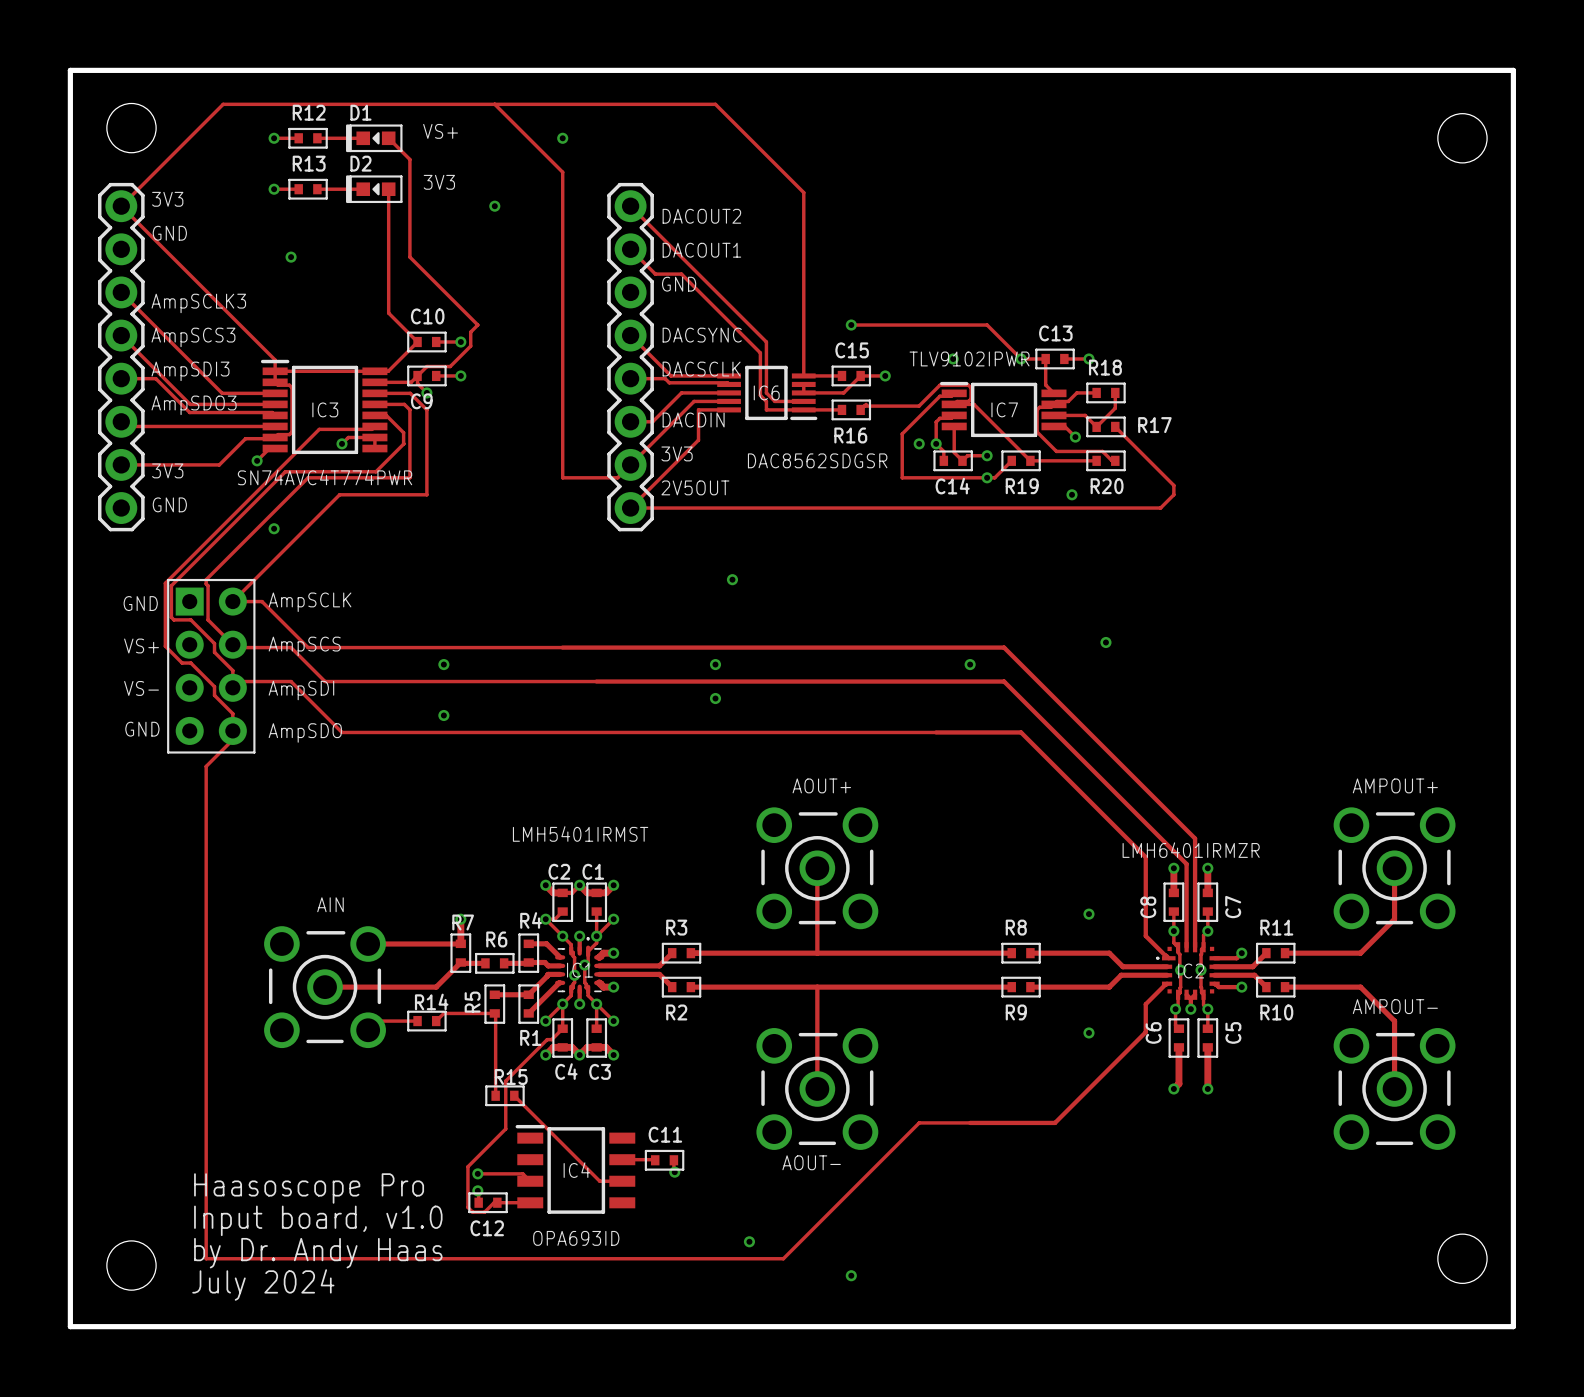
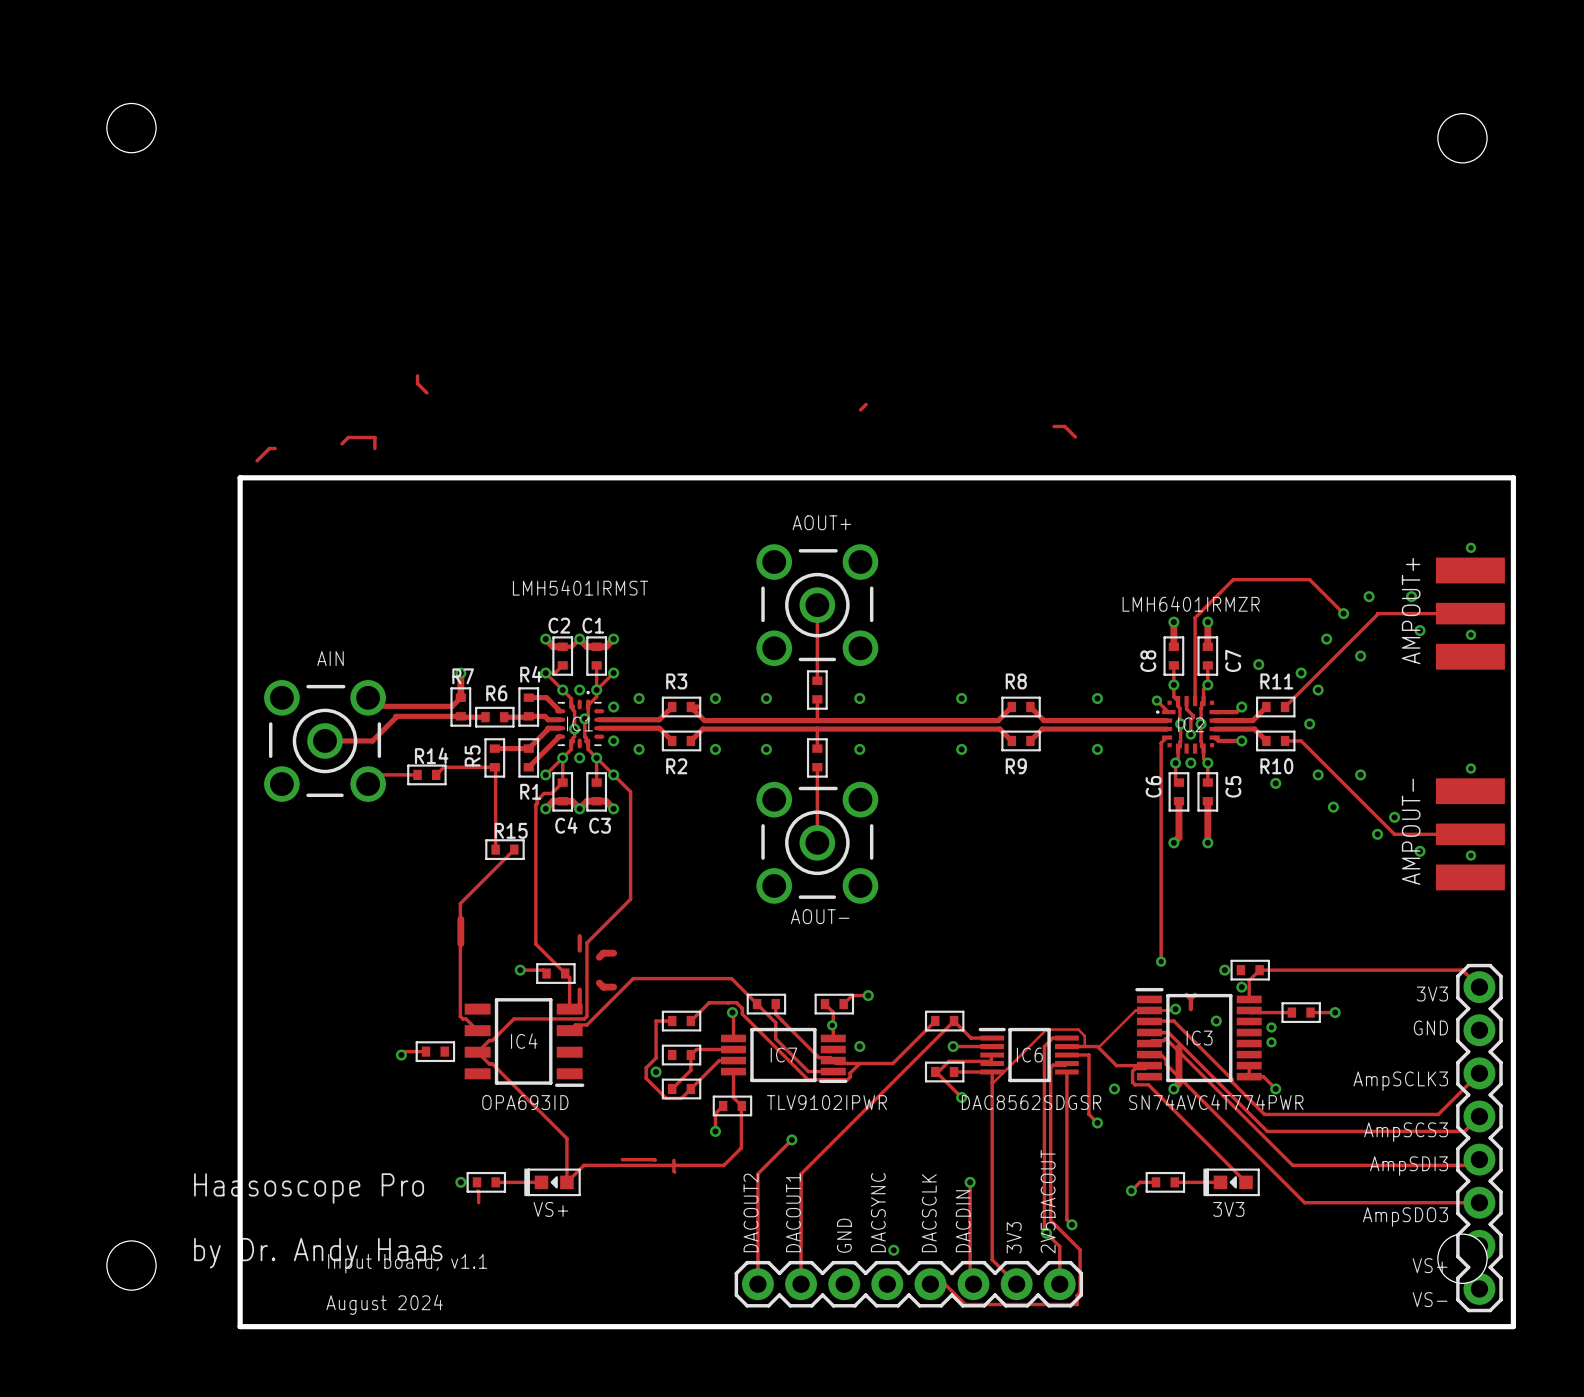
track: (494, 104) (562, 172) (562, 477) (617, 477) (694, 401) (729, 401) -> none
text: VS+ (440, 131) -> none
track: (274, 138) (298, 138) -> none
via: (274, 138) -> none
R12: (308, 138) -> none
track: (317, 138) (363, 138) -> none
D1: (374, 138) -> none
track: (388, 138) (409, 159) (409, 257) (477, 325) (470, 332) (470, 346) (450, 366) (426, 366) (411, 382) (374, 382) -> none
via: (562, 138) -> none
text: 3V3 (439, 182) -> none
track: (274, 189) (298, 189) -> none
via: (274, 189) -> none
R13: (308, 189) -> none
track: (317, 189) (363, 189) -> none
D2: (374, 189) -> none
track: (388, 189) (388, 313) (417, 342) (388, 371) (275, 371) -> none
text: 3V3 (167, 199) -> none
via: (494, 206) -> none
track: (630, 206) (766, 342) (766, 392) (774, 401) (803, 401) -> none
text: DACOUT2 (701, 216) -> none
text: GND (169, 233) -> none
track: (630, 249) (655, 274) (681, 274) (760, 352) (760, 395) (766, 401) (766, 409) (841, 409) -> none
text: DACOUT1 (701, 250) -> none
via: (291, 257) -> none
text: GND (679, 284) -> none
track: (121, 292) (222, 393) (275, 393) -> none
text: AmpSCLK3 (198, 303) -> none
track: (851, 325) (987, 325) (1021, 358) (1045, 358) (1045, 385) (1053, 393) -> none
via: (851, 325) -> none
track: (121, 335) (190, 404) (275, 404) -> none
track: (630, 335) (671, 375) (729, 375) -> none
text: DACSYNC (702, 335) -> none
text: AmpSCS3 (193, 337) -> none
C10: (426, 342) -> none
track: (436, 342) (460, 342) -> none
via: (460, 342) -> none
part: (121, 357) -> none
part: (630, 357) -> none
via: (953, 358) -> none
via: (1021, 358) -> none
C13: (1055, 358) -> none
track: (1064, 358) (1088, 358) -> none
via: (1088, 358) -> none
text: DACSCLK (701, 369) -> none
text: AmpSDI3 (190, 371) -> none
C9: (426, 375) -> none
track: (436, 375) (460, 375) -> none
via: (460, 375) -> none
track: (841, 375) (803, 375) (803, 192) (715, 104) (223, 104) (121, 206) (275, 360) (275, 382) (278, 385) (289, 385) (291, 387) (291, 432) (289, 434) (278, 434) (273, 438) (245, 438) (219, 464) (121, 464) -> none
C15: (851, 375) -> none
track: (885, 375) (860, 375) (843, 392) (803, 392) (803, 384) -> none
via: (885, 375) -> none
track: (121, 378) (155, 378) (189, 412) (272, 412) (275, 415) -> none
track: (630, 378) (665, 378) (669, 382) (727, 382) (729, 384) -> none
via: (426, 392) -> none
track: (729, 392) (681, 392) (652, 421) (630, 421) -> none
IC6 rotation: 0° (767, 392) -> 180° (1028, 1055)
IC6 position: (767, 392) -> (1028, 1055)
track: (1096, 392) (1076, 392) (1068, 401) (1056, 401) (1051, 407) (1039, 407) (1037, 409) (1037, 432) (1056, 451) (1102, 451) (1112, 460) (1115, 460) -> none
R18: (1105, 392) -> none
track: (1115, 392) (1115, 408) (1096, 426) (1085, 415) (1053, 415) -> none
track: (374, 393) (410, 393) (426, 409) (426, 494) (339, 494) (232, 601) (262, 601) (308, 647) (1004, 647) (1195, 838) (1195, 947) -> none
track: (954, 393) (951, 396) (939, 396) (902, 433) (902, 477) (994, 477) (1011, 460) -> none
track: (374, 404) (404, 404) (409, 409) (409, 477) (308, 477) (206, 579) (208, 585) (208, 619) (235, 647) (291, 647) (325, 681) (1004, 681) (1186, 864) (1186, 947) -> none
text: AmpSDO3 (194, 405) -> none
IC3 position: (324, 406) -> (1198, 1035)
track: (864, 406) (919, 406) (939, 385) (968, 385) (971, 387) (971, 398) (968, 401) (957, 401) (954, 404) (973, 404) (1030, 460) (1096, 460) -> none
track: (729, 409) (698, 409) (698, 440) (630, 508) (1160, 508) (1173, 494) (1173, 485) (1115, 426) -> none
R16: (851, 409) -> none
IC7 rotation: 0° (1003, 409) -> 180° (784, 1055)
IC7 position: (1003, 409) -> (784, 1055)
track: (374, 415) (386, 415) (403, 432) (403, 443) (375, 471) (285, 471) (171, 585) (171, 617) (173, 619) (190, 619) (214, 643) (214, 652) (232, 670) (232, 687) (239, 681) (291, 681) (342, 732) (1021, 732) (1145, 857) (1145, 936) (1168, 958) -> none
track: (954, 415) (951, 418) (939, 418) (936, 422) (936, 443) (943, 451) (943, 460) -> none
text: DACDIN (693, 419) -> none
track: (121, 421) (125, 426) (275, 426) -> none
track: (374, 426) (372, 429) (319, 429) (165, 583) (165, 646) (182, 663) (190, 663) (214, 686) (214, 695) (232, 713) (232, 739) (206, 766) (206, 1258) (783, 1258) (919, 1122) (1055, 1122) (1145, 1032) (1145, 1004) (1167, 983) -> none
track: (954, 426) (954, 452) (962, 460) (967, 455) (987, 455) -> none
R17: (1105, 426) -> none
via: (1075, 437) -> none
via: (342, 443) -> none
via: (919, 443) -> none
via: (936, 443) -> none
text: 3V3 (677, 453) -> none
via: (987, 455) -> none
via: (257, 460) -> none
IC6 value position: DAC8562SDGSR (817, 460) -> DAC8562SDGSR (1031, 1102)
C14: (953, 460) -> none
R19: (1021, 460) -> none
R20: (1105, 460) -> none
text: 3V3 (167, 470) -> none
IC3 value position: SN74AVC4T774PWR (325, 477) -> SN74AVC4T774PWR (1216, 1102)
via: (987, 477) -> none
board edge: (1513, 477) (1513, 70) (70, 70) (70, 1326) (240, 1326) -> (1513, 477) (240, 477) (240, 1326)
text: 2V5OUT (695, 487) -> none
via: (1072, 494) -> none
text: GND (169, 504) -> none
via: (274, 528) -> none
via: none -> (1470, 547)
via: (732, 579) -> none
via: none -> (1369, 596)
via: none -> (1411, 596)
text: AmpSCLK (310, 602) -> none
text: GND (140, 603) -> none
track: none -> (817, 605) (817, 680)
track: none -> (1343, 613) (1309, 579) (1233, 579) (1195, 617) (1195, 701)
via: none -> (1343, 613)
track: none -> (1470, 613) (1377, 613) (1285, 707)
AMPOUT+: none -> (1470, 613)
via: none -> (1173, 622)
via: none -> (1207, 622)
via: none -> (1420, 630)
via: none -> (1470, 634)
via: none -> (545, 639)
via: none -> (579, 639)
via: none -> (613, 639)
via: none -> (1326, 639)
via: (1105, 642) -> none
text: VS+ (141, 645) -> none
text: AmpSCS (304, 646) -> none
via: none -> (1360, 656)
via position: (443, 664) -> (460, 673)
via: (715, 664) -> none
via position: (970, 664) -> (961, 698)
via: none -> (1258, 664)
track: none -> (596, 665) (596, 696) (588, 705) (588, 715) (584, 718) (584, 736) (588, 743) (588, 749) (630, 791) (630, 899) (586, 942) (586, 1016) (584, 1018) (513, 1018) (477, 1052) (489, 1063) (492, 1063) (566, 1138) (566, 1182) (583, 1165) (723, 1165) (741, 1147) (741, 1105)
track: none -> (1173, 665) (1173, 696) (1178, 701) (1180, 723) (1180, 746) (1178, 748) (1178, 760) (1175, 763) (1175, 779) (1178, 782)
part: (211, 666) -> none
track: none -> (460, 673) (460, 697) (452, 706) (376, 706) (368, 697)
via: none -> (545, 673)
via: none -> (613, 673)
via: none -> (1301, 673)
via: none -> (1173, 684)
via: none -> (1207, 684)
text: VS- (141, 688) -> none
text: AmpSDI (301, 690) -> none
via: none -> (562, 690)
via: none -> (579, 690)
via: none -> (596, 690)
part: none -> (817, 690)
via: none -> (1318, 690)
via: none -> (639, 698)
via: none -> (766, 698)
via: none -> (859, 698)
via: none -> (1097, 698)
track: none -> (817, 699) (817, 720)
track: none -> (1156, 700) (1168, 712)
via: none -> (1156, 700)
track: none -> (1186, 701) (1186, 709) (1192, 715) (1190, 719) (1190, 734)
via: none -> (613, 707)
track: none -> (698, 707) (690, 707) (704, 720) (998, 720) (1011, 707)
track: none -> (1030, 707) (1043, 720) (1167, 720)
via: none -> (1241, 707)
via: (443, 715) -> none
track: none -> (485, 717) (396, 716) (372, 740) (325, 740)
via: none -> (584, 718)
via: none -> (1180, 723)
via: none -> (1201, 723)
via: none -> (1309, 723)
text: GND (142, 729) -> none
via: none -> (574, 729)
track: none -> (817, 729) (817, 748)
track: none -> (1167, 729) (1042, 729) (1030, 740)
text: AmpSDO (305, 732) -> none
via: none -> (1190, 734)
track: none -> (1167, 737) (1161, 743) (1161, 961)
via: none -> (613, 740)
track: none -> (690, 740) (702, 729) (999, 729) (1011, 740)
via: none -> (1241, 740)
track: none -> (1285, 740) (1301, 740) (1394, 834) (1479, 834)
via: none -> (639, 749)
via: none -> (715, 749)
via: none -> (766, 749)
via: none -> (859, 749)
via: none -> (961, 749)
via: none -> (1097, 749)
track: none -> (562, 757) (562, 782) (551, 793) (544, 793) (535, 804) (535, 944) (569, 977) (569, 1009)
via: none -> (562, 757)
via: none -> (579, 757)
via: none -> (596, 757)
part: none -> (817, 757)
via: none -> (1175, 763)
via: none -> (1190, 763)
via: none -> (1207, 763)
track: none -> (817, 767) (817, 842)
via: none -> (1470, 768)
via: none -> (545, 774)
via: none -> (613, 774)
via: none -> (1318, 774)
via: none -> (1360, 774)
via: none -> (1275, 783)
track: none -> (1178, 801) (1178, 837) (1173, 842)
via: none -> (1333, 807)
via: none -> (545, 808)
via: none -> (579, 808)
via: none -> (613, 808)
via: none -> (1394, 817)
via: none -> (1377, 834)
AMPOUT-: none -> (1470, 834)
via: none -> (1173, 842)
via: none -> (1207, 842)
track: none -> (514, 849) (460, 903) (460, 1016) (465, 1018) (477, 1030)
via: none -> (1420, 851)
via: none -> (1470, 855)
track: (817, 868) (817, 953) -> none
AOUT+ position: (817, 868) -> (817, 605)
track: (1173, 868) (1173, 892) -> (1173, 622) (1173, 646)
via: (1173, 868) -> none
track: (1207, 868) (1207, 892) -> (1207, 622) (1207, 646)
via: (1207, 868) -> none
track: (1394, 868) (1394, 919) (1360, 953) (1285, 953) -> none
AMPOUT+: (1394, 868) -> none
track: (545, 885) (553, 892) (572, 892) (579, 885) (587, 892) (605, 892) (613, 885) -> (545, 639) (553, 646) (572, 646) (579, 639) (587, 646) (605, 646) (613, 639)
via: (545, 885) -> none
via: (579, 885) -> none
via: (613, 885) -> none
C2 position: (562, 902) -> (562, 656)
C1 position: (596, 902) -> (596, 656)
C8 position: (1173, 902) -> (1173, 656)
C7 position: (1207, 902) -> (1207, 656)
track: (562, 911) (555, 919) (545, 919) (571, 944) (571, 950) (574, 957) (574, 982) (571, 989) (571, 995) (545, 1021) -> (562, 665) (555, 673) (545, 673) (571, 698) (571, 704) (574, 711) (574, 736) (571, 743) (571, 749) (545, 774)
track: (596, 911) (596, 942) (588, 951) (588, 961) (584, 965) (584, 982) (588, 989) (588, 995) (613, 1021) -> none
track: (1173, 911) (1173, 942) (1176, 945) -> none
track: (1207, 911) (1207, 931) (1203, 935) (1203, 947) (1201, 954) (1201, 987) (1203, 1004) (1207, 1009) (1207, 1028) -> (1207, 665) (1207, 684) (1203, 689) (1203, 701) (1201, 708) (1201, 741) (1203, 758) (1207, 763) (1207, 782)
via: (1088, 914) -> none
via: (460, 919) -> none
via: (545, 919) -> none
track: (613, 919) (596, 936) -> (613, 673) (596, 690)
via: (613, 919) -> none
via: (1173, 931) -> none
via: (1207, 931) -> none
via: (562, 936) -> none
via: (579, 936) -> none
via: (596, 936) -> none
track: (528, 943) (546, 943) (560, 957) -> (528, 697) (546, 697) (560, 711)
track: (368, 944) (460, 944) -> none
track: (1176, 945) (1179, 954) (1180, 970) (1180, 992) (1178, 994) (1178, 1006) (1175, 1009) (1175, 1025) (1178, 1028) -> none
R7 position: (460, 953) -> (460, 707)
R4 position: (528, 953) -> (528, 707)
via: (613, 953) -> none
track: (672, 953) (659, 965) (599, 965) -> (672, 707) (659, 719) (599, 719)
R3 position: (681, 953) -> (681, 707)
track: (690, 953) (1011, 953) -> none
R8 position: (1021, 953) -> (1021, 707)
track: (1030, 953) (1109, 953) (1122, 966) (1167, 966) -> none
track: (1241, 953) (1236, 958) (1214, 958) -> (1241, 707) (1236, 712) (1214, 712)
via: (1241, 953) -> none
track: (1266, 953) (1252, 966) (1214, 966) -> (1266, 707) (1252, 720) (1214, 720)
R11 position: (1275, 953) -> (1275, 707)
via: none -> (1161, 961)
track: (485, 963) (460, 962) (436, 987) (325, 987) -> none
R6 position: (494, 963) -> (494, 717)
track: (504, 963) (544, 962) (548, 965) (560, 965) -> (504, 717) (544, 716) (548, 719) (560, 719)
IC1 position: (579, 965) -> (579, 719)
via: (584, 965) -> none
track: none -> (520, 970) (543, 970) (546, 973)
via: none -> (520, 970)
via: (1180, 970) -> none
IC2 position: (1187, 970) -> (1187, 724)
via: (1201, 970) -> none
via: none -> (1224, 970)
part: none -> (1250, 970)
part: none -> (555, 973)
track: (560, 974) (548, 974) (528, 994) (494, 994) -> (560, 728) (548, 728) (528, 748) (494, 748)
track: (599, 974) (659, 974) (672, 987) -> (599, 728) (659, 728) (672, 740)
via: (574, 975) -> none
track: (1167, 975) (1121, 975) (1109, 987) (1030, 987) -> none
track: (1214, 975) (1254, 975) (1266, 987) -> (1214, 729) (1254, 729) (1266, 740)
track: (560, 982) (528, 1013) -> (560, 736) (528, 767)
track: (1214, 983) (1218, 987) (1241, 987) -> (1214, 737) (1218, 740) (1241, 740)
AIN position: (325, 987) -> (325, 740)
via: (613, 987) -> none
R2 position: (681, 987) -> (681, 740)
track: (690, 987) (1011, 987) -> none
track: (817, 987) (817, 1088) -> none
R9 position: (1021, 987) -> (1021, 740)
R10 position: (1275, 987) -> (1275, 740)
track: (1285, 987) (1360, 987) (1394, 1021) (1394, 1088) -> none
track: none -> (1479, 987) (1462, 970) (1259, 970) (1249, 980) (1249, 999)
text: none -> 3V3 (1432, 994)
track: none -> (868, 995) (852, 995) (843, 1004)
via: none -> (868, 995)
track: none -> (709, 1002) (690, 1021)
track: none -> (709, 1002) (728, 1002)
track: none -> (728, 1002) (736, 1002) (742, 1008) (742, 1014) (808, 1079) (847, 1079) (850, 1073) (859, 1063)
R5 position: (494, 1004) -> (494, 757)
R1 position: (528, 1004) -> (528, 757)
track: (562, 1004) (562, 1028) (551, 1039) (547, 1039) (505, 1081) (505, 1128) (467, 1166) (467, 1207) (472, 1212) (484, 1212) (494, 1202) (530, 1202) -> none
via: (562, 1004) -> none
via: (579, 1004) -> none
track: (596, 1004) (596, 1028) -> (596, 757) (596, 782)
via: (596, 1004) -> none
part: none -> (766, 1004)
track: none -> (775, 1004) (775, 1014) (781, 1020)
track: none -> (824, 1004) (833, 1012) (833, 1038)
part: none -> (834, 1004)
via: (1190, 1009) -> none
via: (1207, 1009) -> none
track: none -> (1173, 1010) (1135, 1010) (1098, 1047)
track: none -> (1249, 1010) (1251, 1012) (1291, 1012)
track: none -> (732, 1012) (733, 1038)
via: none -> (732, 1012)
part: none -> (1301, 1012)
track: none -> (1310, 1012) (1335, 1012)
via: none -> (1335, 1012)
track: none -> (781, 1020) (818, 1057) (830, 1057) (836, 1063) (892, 1063) (935, 1021)
track: (417, 1021) (377, 1021) (368, 1030) -> (417, 774) (377, 774) (368, 784)
R14 position: (426, 1021) -> (426, 774)
track: (436, 1021) (443, 1013) (495, 1014) (495, 1095) -> (436, 774) (443, 767) (495, 768) (495, 849)
via: (545, 1021) -> none
via: (613, 1021) -> none
track: none -> (672, 1021) (656, 1021) (656, 1058) (646, 1067) (646, 1078) (666, 1098) (681, 1098) (719, 1060) (733, 1060)
part: none -> (681, 1021)
part: none -> (944, 1021)
track: none -> (1149, 1021) (1173, 1021) (1264, 1114) (1438, 1114) (1479, 1073)
via: none -> (1216, 1021)
via: none -> (832, 1025)
via: none -> (1271, 1027)
text: none -> GND (1430, 1027)
track: none -> (569, 1030) (575, 1024) (586, 1024) (633, 978) (731, 978) (775, 1022) (775, 1038) (808, 1071) (833, 1071)
via: (1088, 1032) -> none
track: none -> (1163, 1032) (1168, 1032) (1267, 1131) (1464, 1131) (1479, 1116)
C4 position: (562, 1038) -> (562, 791)
C3 position: (596, 1038) -> (596, 791)
track: none -> (992, 1038) (970, 1038) (954, 1021) (801, 1174) (801, 1284)
track: none -> (1066, 1038) (1052, 1038) (1044, 1046) (1044, 1231) (1059, 1246) (1059, 1284)
C6 position: (1178, 1038) -> (1178, 791)
C5 position: (1207, 1038) -> (1207, 791)
via: none -> (1271, 1042)
track: none -> (1149, 1043) (1152, 1040) (1163, 1040) (1165, 1038) (1292, 1165) (1473, 1165) (1479, 1159)
via: none -> (859, 1046)
track: none -> (953, 1046) (992, 1046)
via: none -> (953, 1046)
track: none -> (1066, 1046) (1097, 1046) (1116, 1065) (1149, 1065)
track: none -> (1084, 1046) (1084, 1035) (1078, 1029) (1046, 1029) (992, 1082)
track: (1207, 1047) (1207, 1088) -> (1207, 801) (1207, 842)
track: none -> (733, 1049) (696, 1049) (690, 1055) (690, 1070) (672, 1088)
track: none -> (426, 1051) (404, 1051) (401, 1055)
part: none -> (435, 1051)
track: none -> (1149, 1054) (1160, 1054) (1166, 1060) (1166, 1064) (1304, 1202) (1479, 1202)
via: none -> (401, 1055)
track: (545, 1055) (553, 1047) (572, 1047) (579, 1055) (587, 1047) (605, 1047) (613, 1055) -> (545, 808) (553, 801) (572, 801) (579, 808) (587, 801) (605, 801) (613, 808)
via: (545, 1055) -> none
via: (579, 1055) -> none
via: (613, 1055) -> none
part: none -> (681, 1055)
track: none -> (992, 1055) (992, 1063) (991, 1061) (948, 1061) (938, 1072) (935, 1072)
track: none -> (1066, 1055) (1088, 1055) (1088, 1114) (1097, 1122)
track: none -> (1066, 1063) (1053, 1065) (1050, 1067) (1050, 1220) (1080, 1249) (1080, 1292) (1077, 1295) (1077, 1304) (965, 1304) (944, 1284) (930, 1284)
track: none -> (1148, 1065) (1145, 1068) (1135, 1068) (1132, 1071) (1132, 1082) (1135, 1084) (1148, 1084) (1246, 1182)
track: none -> (1249, 1065) (1249, 1076) (1263, 1076) (1275, 1088)
track: none -> (733, 1071) (733, 1097) (741, 1105)
via: none -> (656, 1072)
track: none -> (936, 1072) (961, 1097)
part: none -> (944, 1072)
track: none -> (954, 1072) (992, 1072) (992, 1259) (1016, 1284)
track: none -> (1066, 1072) (1066, 1219) (1072, 1224)
text: none -> AmpSCLK3 (1400, 1081)
part: none -> (681, 1088)
AOUT- position: (817, 1088) -> (817, 842)
via: none -> (1114, 1088)
via: (1207, 1088) -> none
via: none -> (1275, 1088)
AMPOUT-: (1394, 1088) -> none
R15 position: (504, 1095) -> (504, 849)
track: (514, 1095) (599, 1181) (622, 1181) -> none
via: none -> (961, 1097)
track: none -> (723, 1105) (715, 1113) (715, 1131)
part: none -> (732, 1105)
via: none -> (1097, 1122)
via: none -> (715, 1131)
text: none -> AmpSCS3 (1406, 1132)
part: none -> (1479, 1138)
track: none -> (791, 1139) (757, 1173) (757, 1284)
via: none -> (791, 1139)
C11: (664, 1160) -> none
AOUT- name position: AOUT- (811, 1162) -> AOUT- (820, 916)
text: none -> AmpSDI3 (1409, 1166)
IC4 rotation: 0° (575, 1169) -> 180° (524, 1042)
IC4 position: (575, 1169) -> (524, 1042)
via: (674, 1172) -> none
track: (477, 1173) (522, 1173) (530, 1181) -> none
via: (477, 1173) -> none
via: none -> (460, 1182)
part: none -> (486, 1182)
track: none -> (495, 1182) (541, 1182)
part: none -> (552, 1182)
track: none -> (970, 1182) (970, 1280) (973, 1284)
via: none -> (970, 1182)
track: none -> (1156, 1182) (1139, 1182) (1131, 1190)
part: none -> (1165, 1182)
track: none -> (1174, 1182) (1220, 1182)
part: none -> (1231, 1182)
via: (477, 1190) -> none
via: none -> (1131, 1190)
text: none -> 2V5DACOUT (1048, 1201)
C12: (488, 1202) -> none
text: none -> VS+ (550, 1209)
text: none -> 3V3 (1228, 1209)
text: none -> DACOUT2 (751, 1212)
text: none -> DACOUT1 (793, 1212)
text: none -> DACSYNC (878, 1212)
text: none -> DACSCLK (929, 1213)
text: none -> AmpSDO3 (1405, 1217)
text: Input board, v1.0 (318, 1220) -> none
text: none -> DACDIN (963, 1221)
via: none -> (1072, 1224)
via: none -> (1046, 1233)
text: none -> GND (844, 1235)
text: none -> 3V3 (1014, 1237)
via: (749, 1241) -> none
text: none -> Input board, v1.1 (407, 1263)
text: none -> VS+ (1430, 1265)
via position: (851, 1275) -> (893, 1250)
part: none -> (908, 1284)
text: July 2024 (263, 1285) -> none
text: none -> VS- (1430, 1299)
text: none -> August 2024 (384, 1304)

